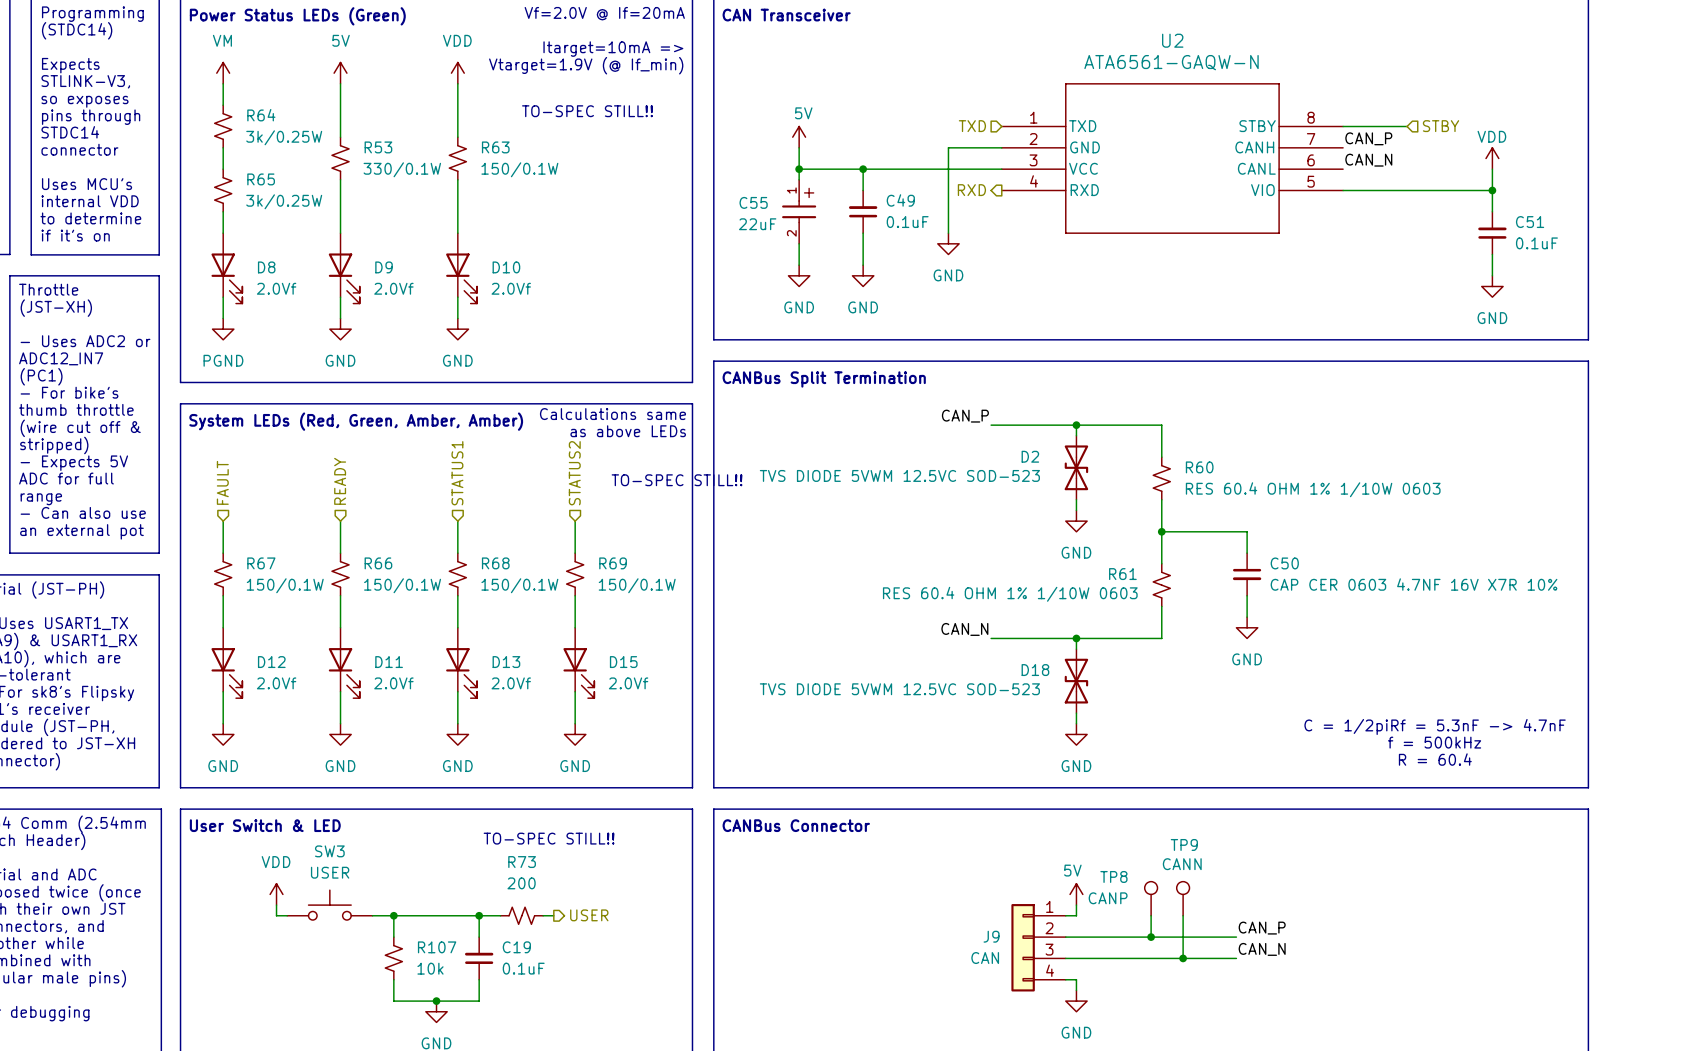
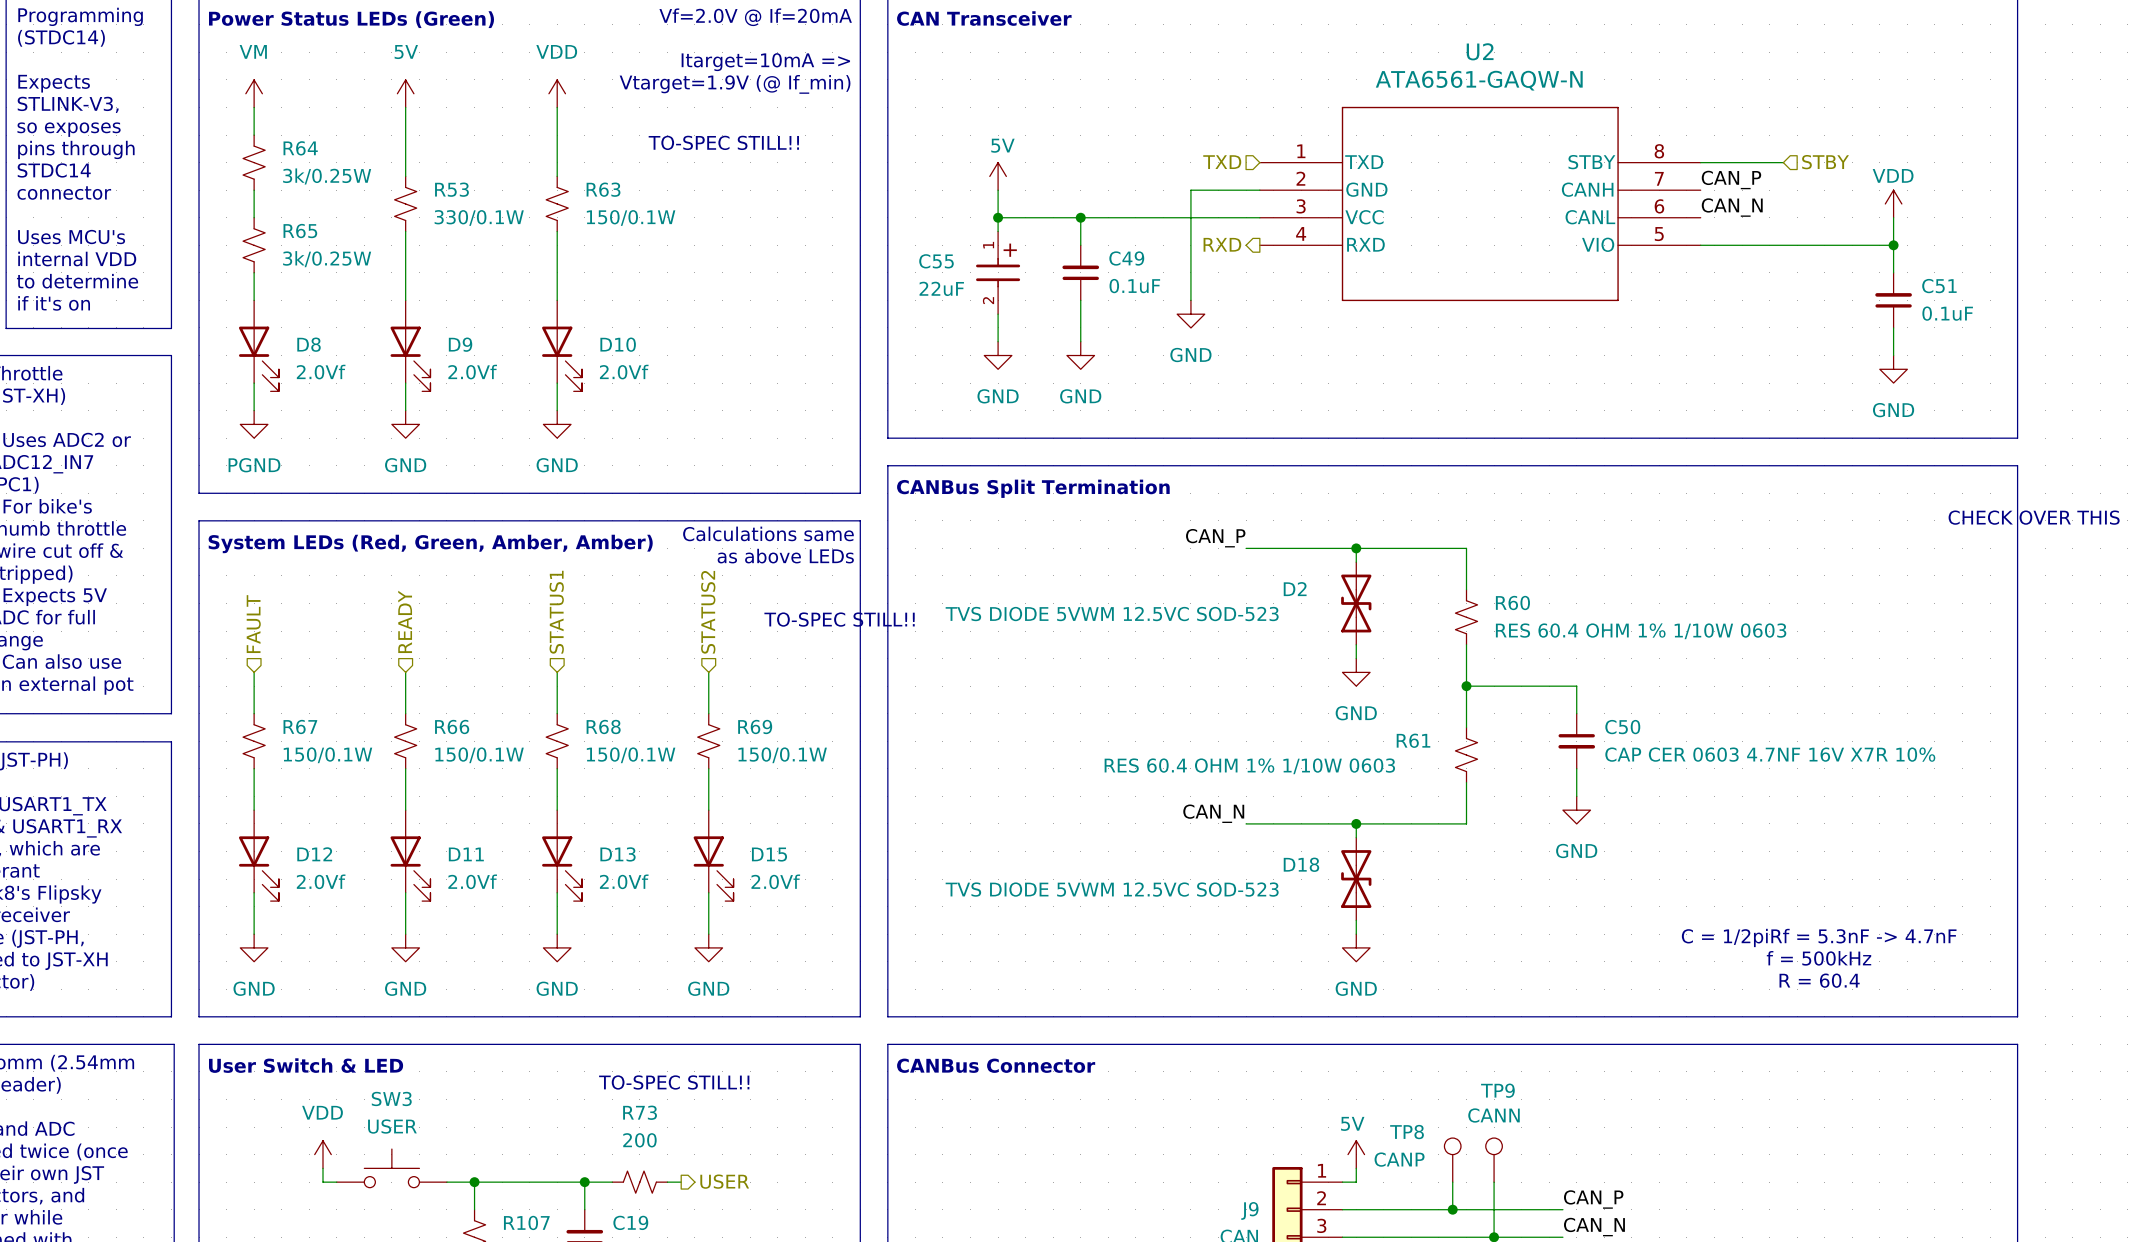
text: none -> CHECK OVER THIS (2034, 517)

